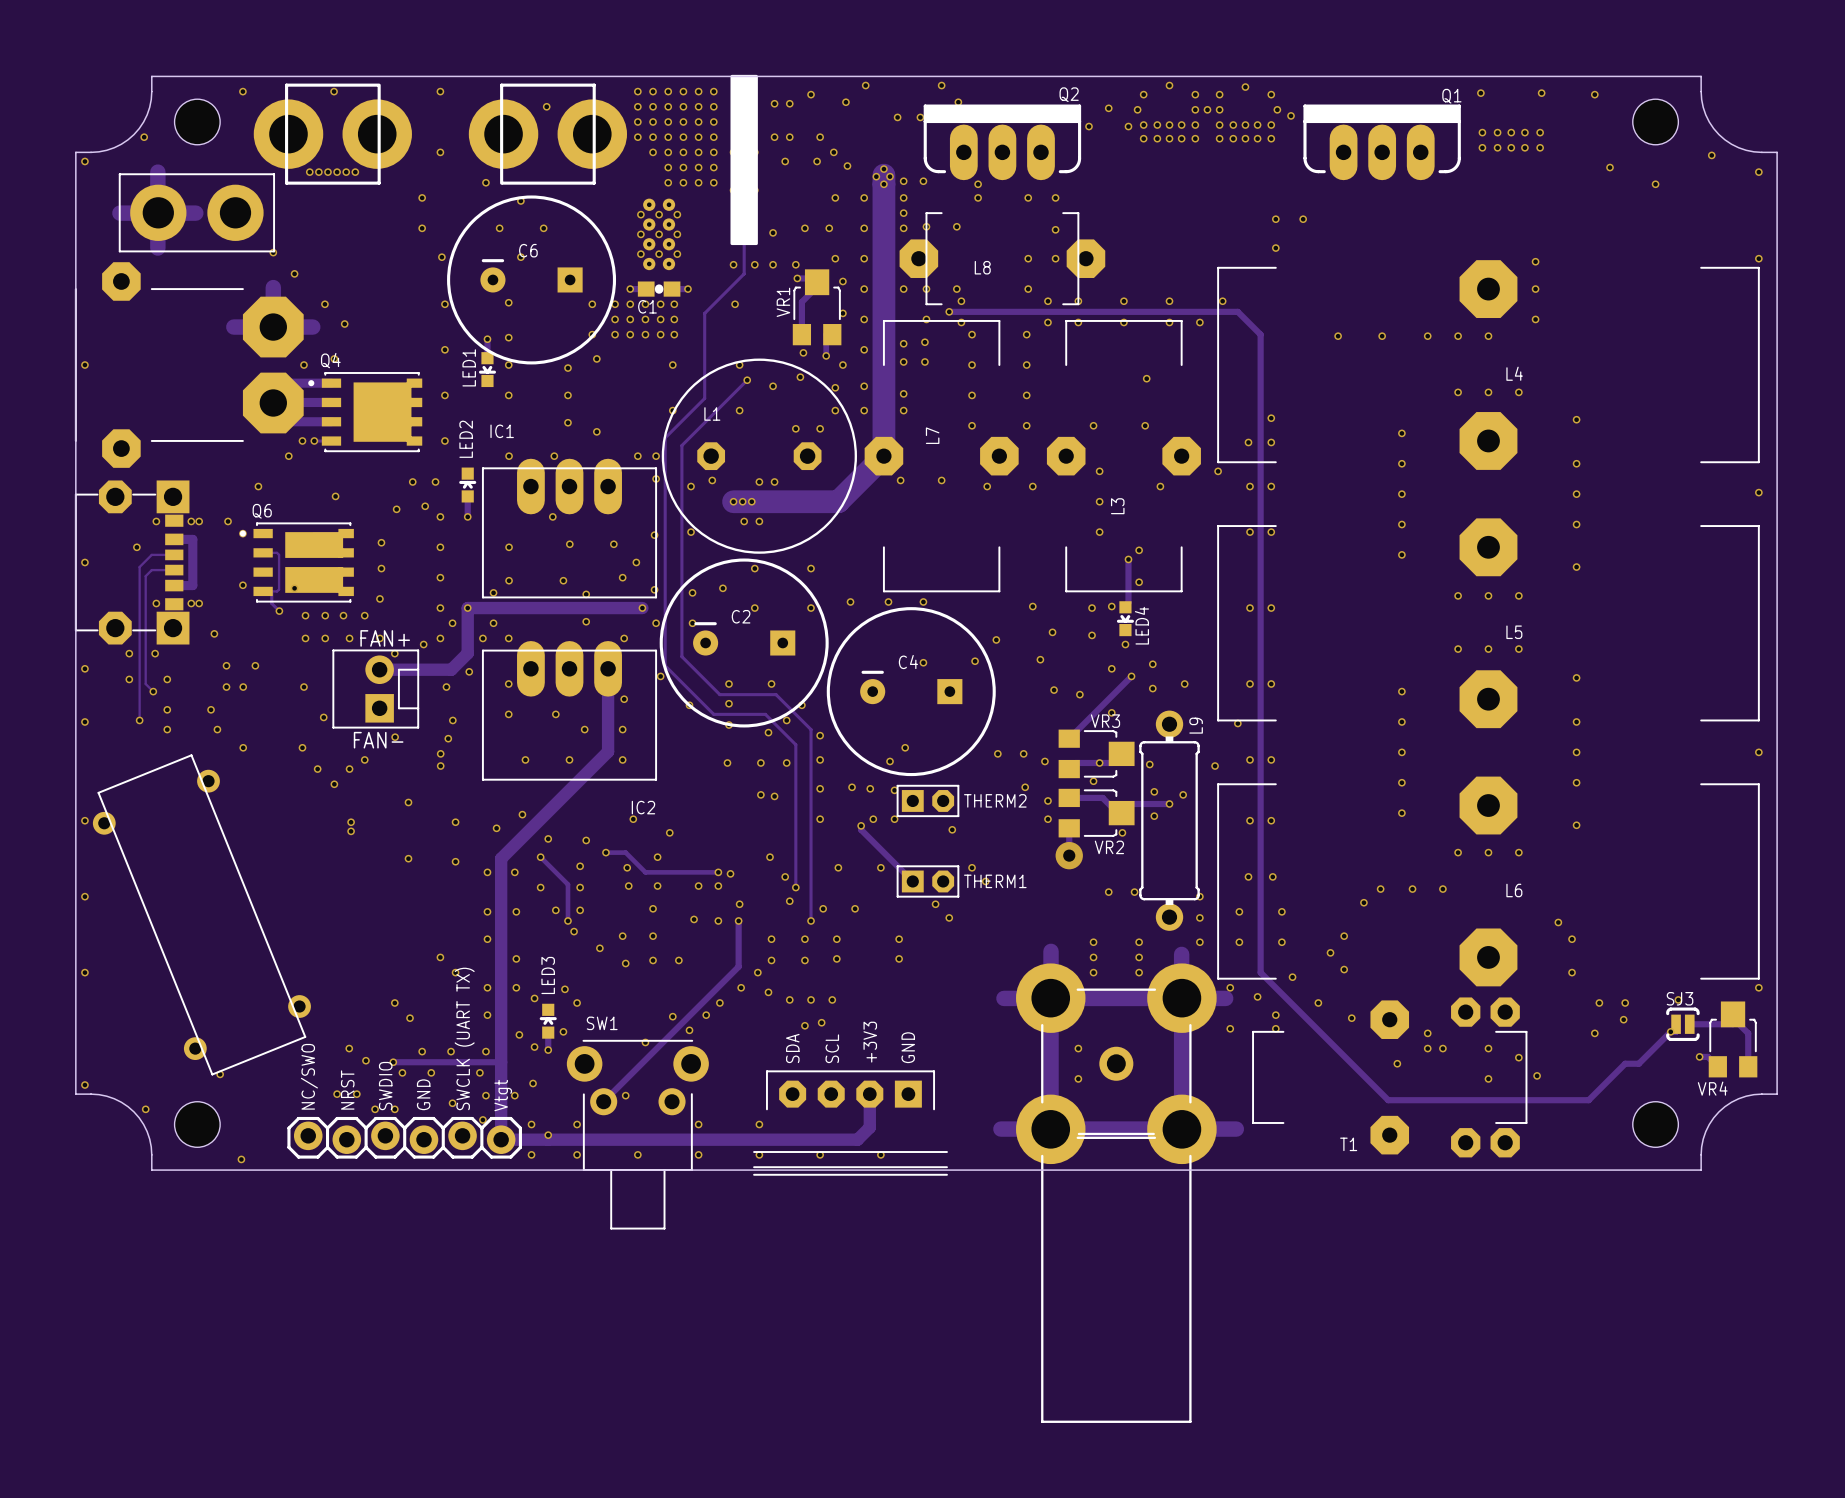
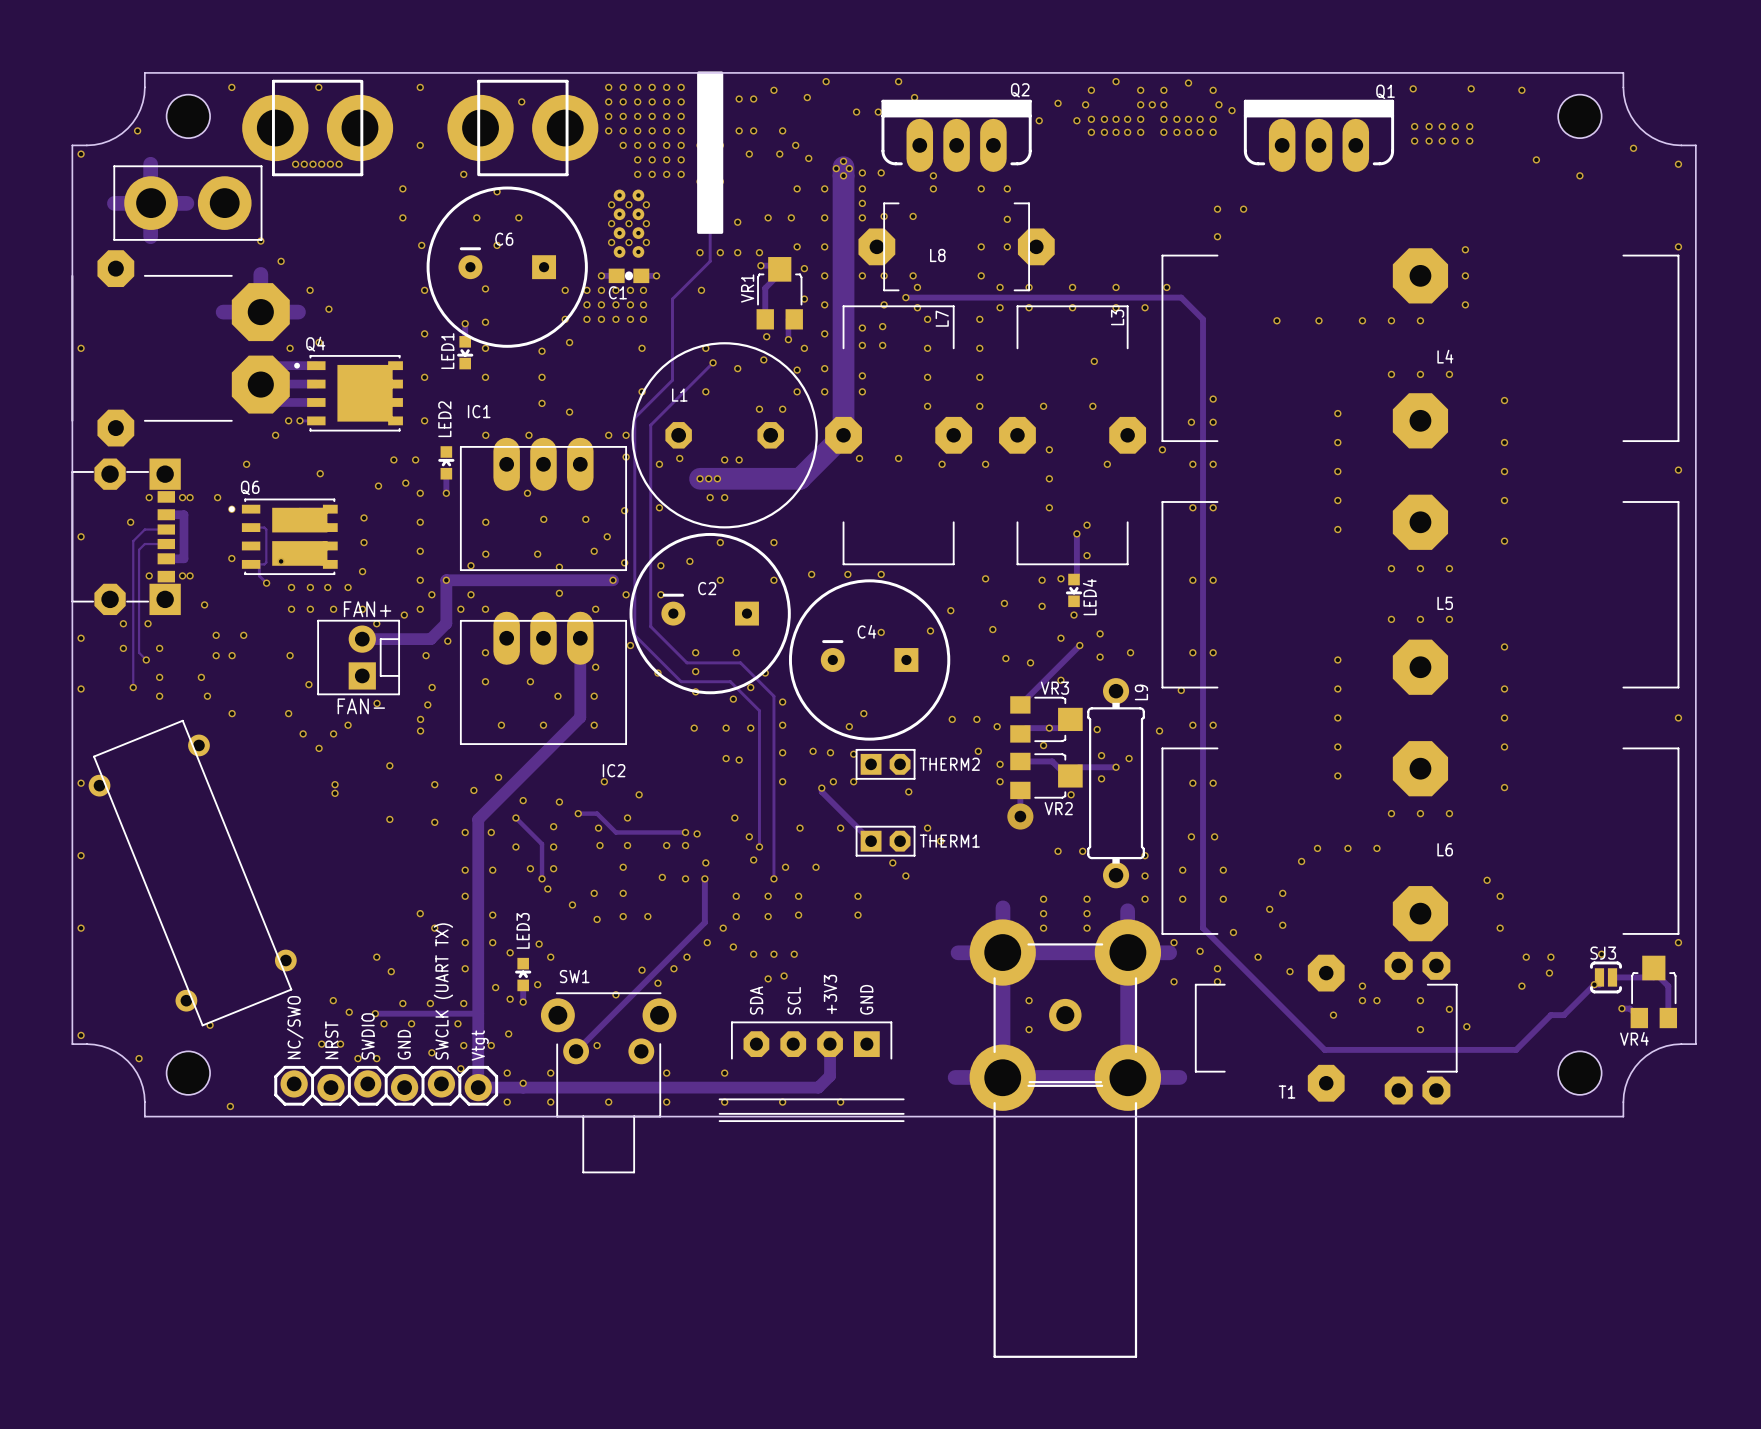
L7 name position: L7 (932, 435) -> L7 (942, 318)
L3 name position: L3 (1117, 506) -> L3 (1117, 317)

